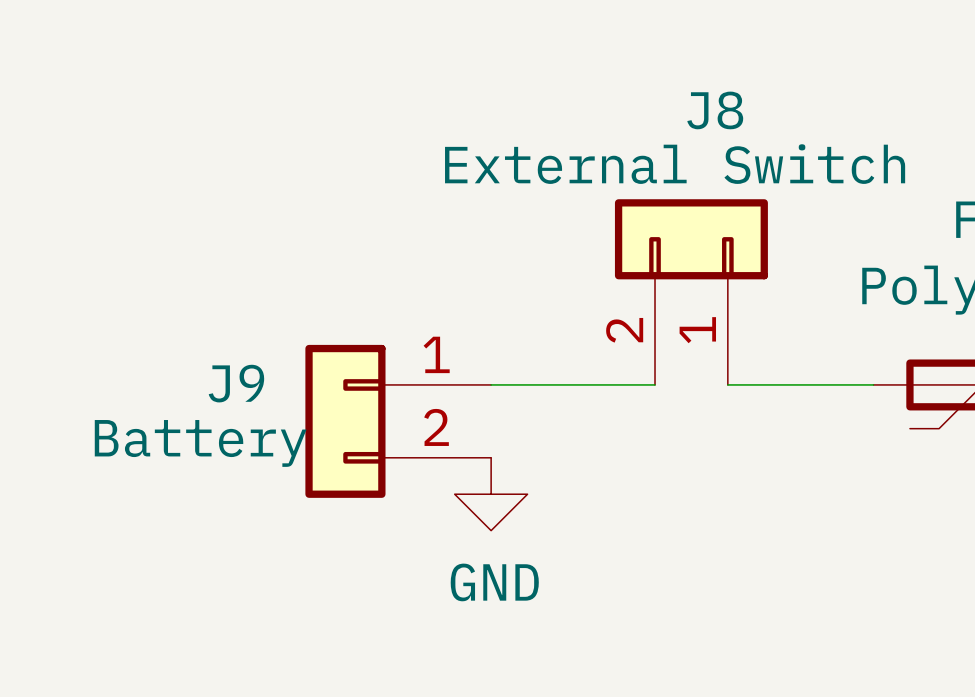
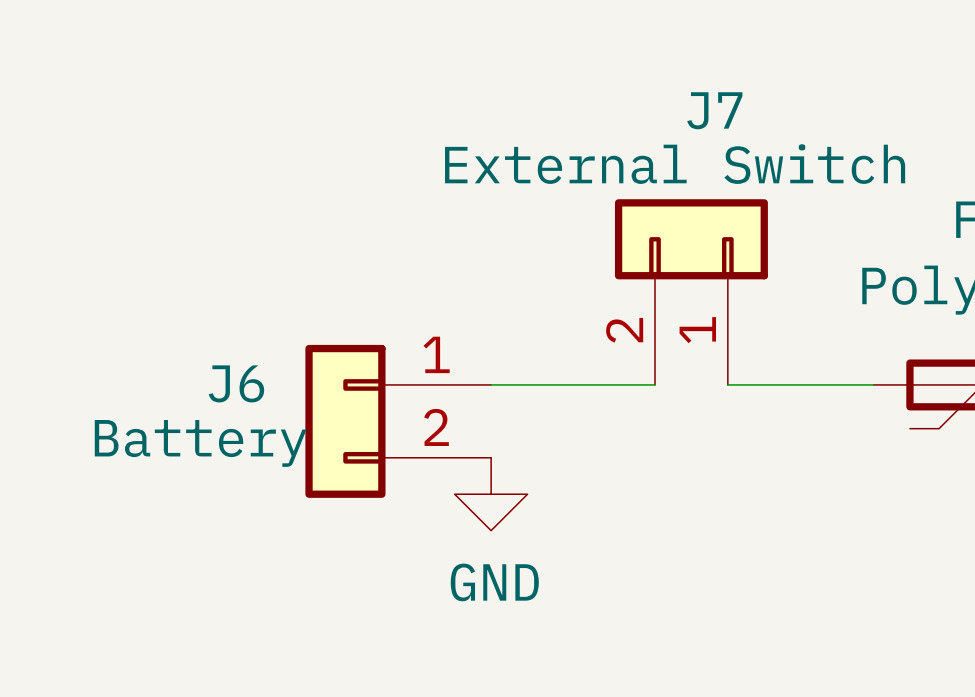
J8 name: J8 (715, 110) -> J7 (714, 110)
J9 name: J9 (236, 383) -> J6 (236, 383)

